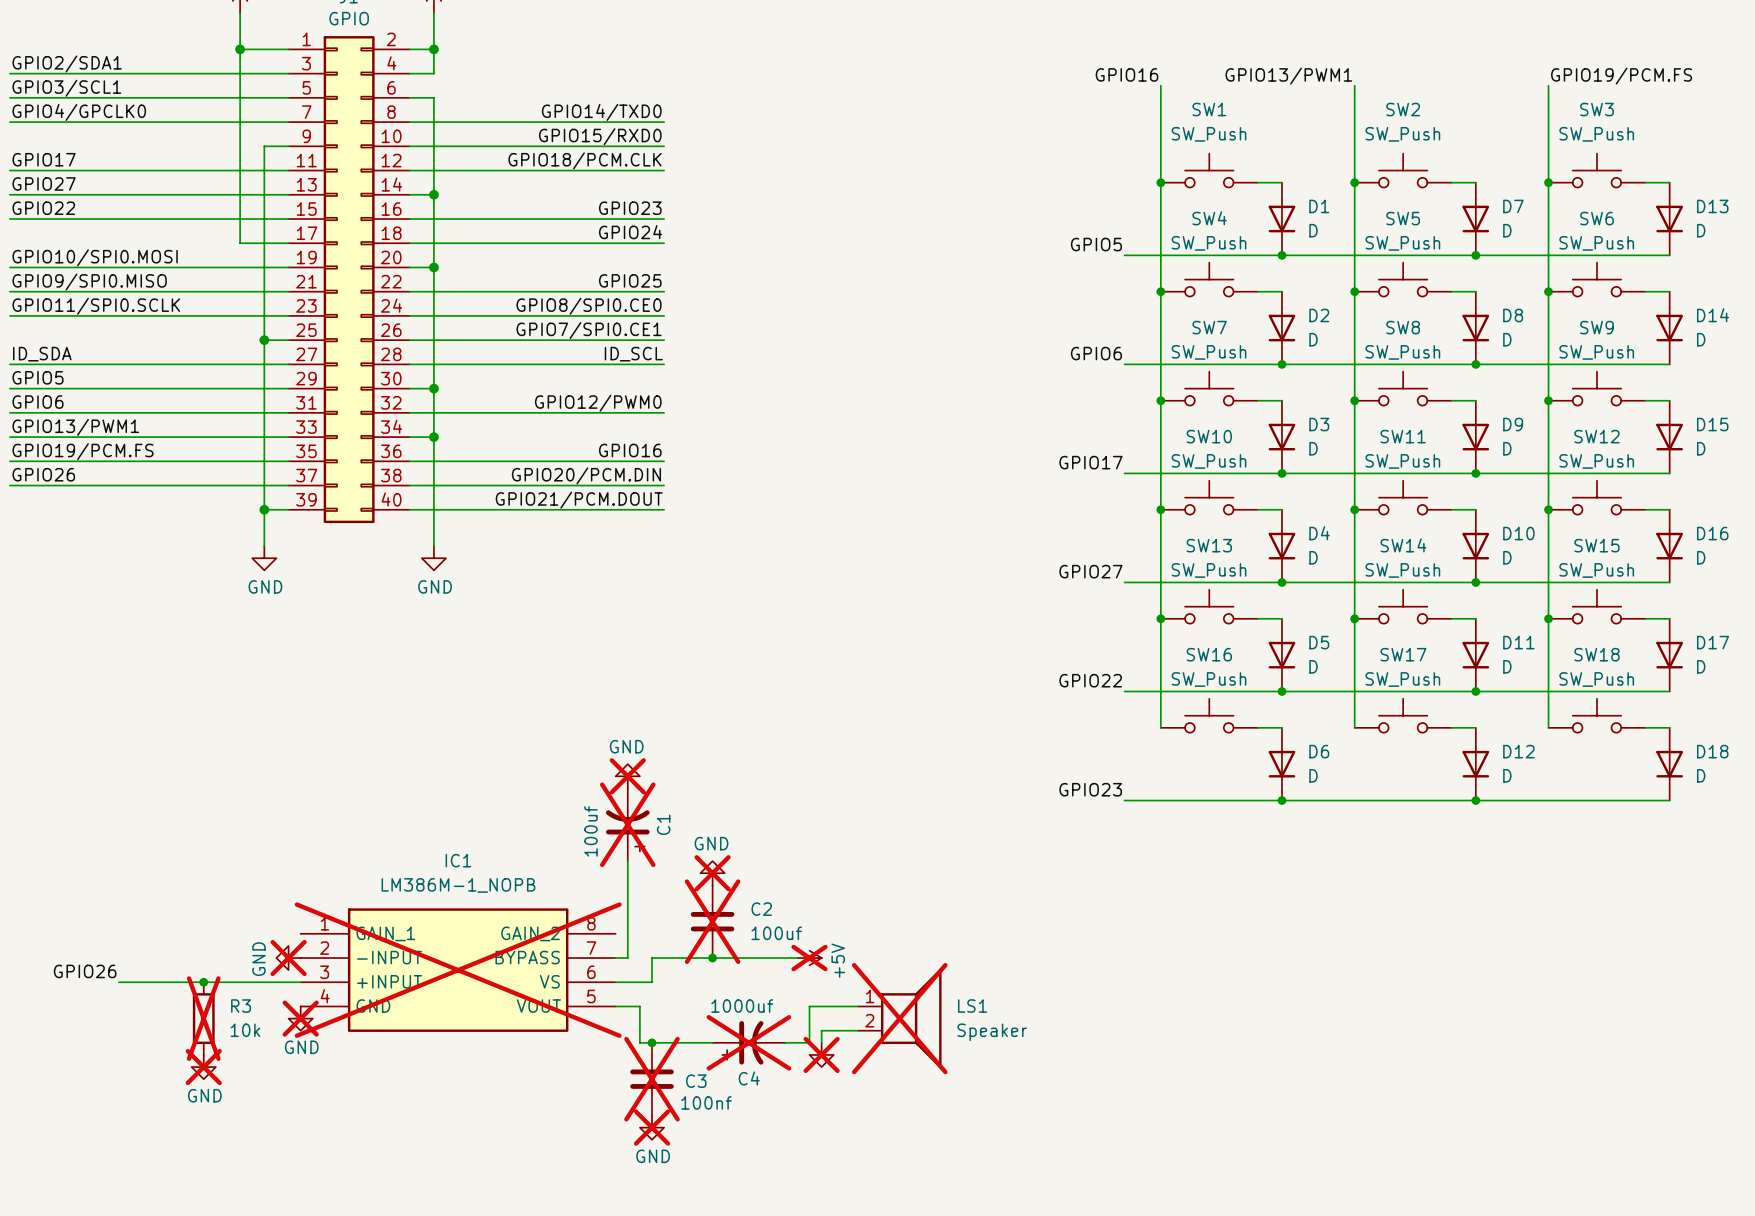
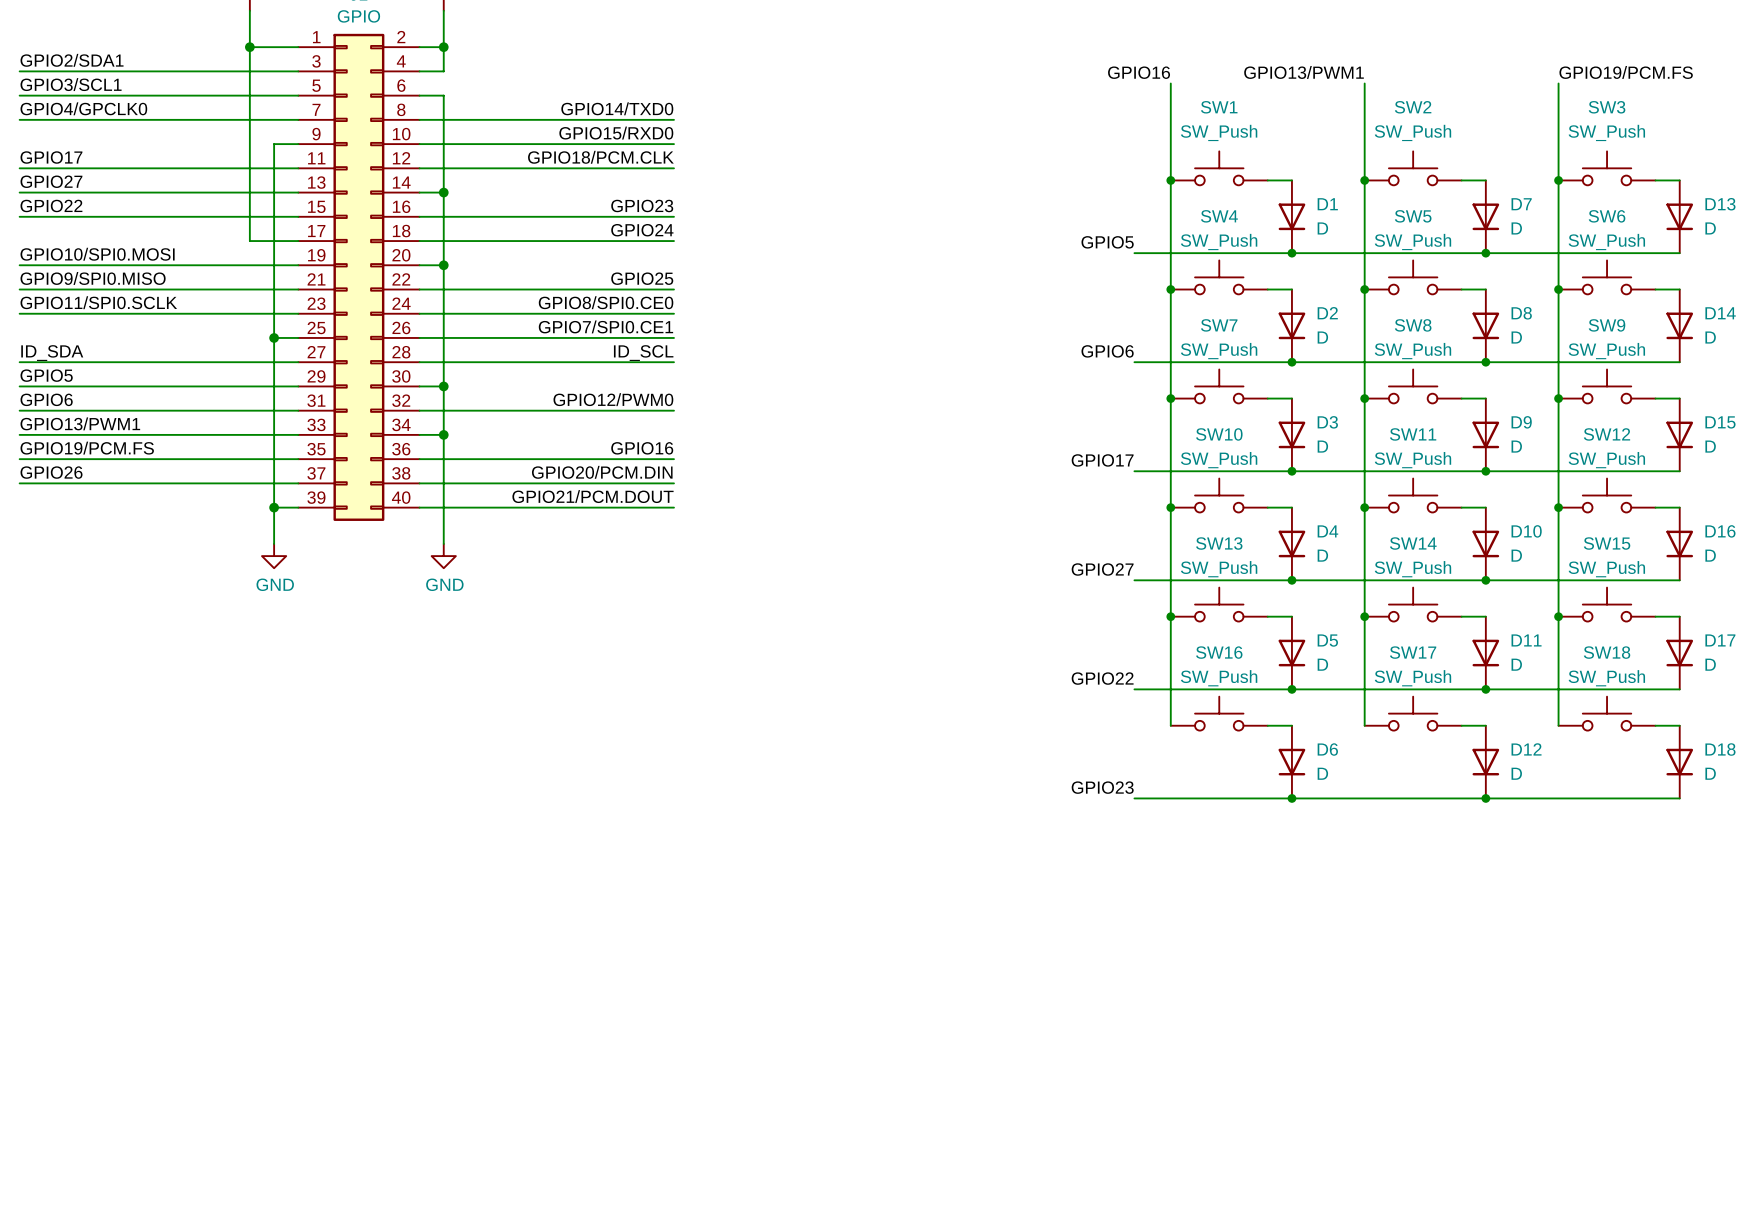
power symbol: GND (627, 776) -> none
C1: 100uf (627, 824) -> none
wire: (627, 861) (627, 958) (615, 958) -> none
power symbol: GND (712, 873) -> none
C2: 100uf (712, 921) -> none
power symbol: GND (288, 958) -> none
junction: (712, 958) -> none
wire: (797, 958) (652, 958) (652, 982) (615, 982) -> none
power symbol: +5V (809, 958) -> none
IC1: LM386M-1_NOPB (458, 970) -> none
label: GPIO26 (85, 971) -> none
wire: (118, 982) (300, 982) -> none
junction: (203, 982) -> none
wire: (615, 1006) (639, 1006) (639, 1042) (712, 1042) -> none
wire: (857, 1006) (809, 1006) (809, 1042) (785, 1042) -> none
R3: 10k (203, 1018) -> none
power symbol: GND (300, 1018) -> none
LS1: Speaker (899, 1018) -> none
wire: (857, 1030) (821, 1030) (821, 1042) -> none
junction: (652, 1042) -> none
C4: 1000uf (748, 1042) -> none
power symbol: (821, 1054) -> none
power symbol: GND (203, 1067) -> none
C3: 100nf (652, 1079) -> none
power symbol: GND (652, 1127) -> none

